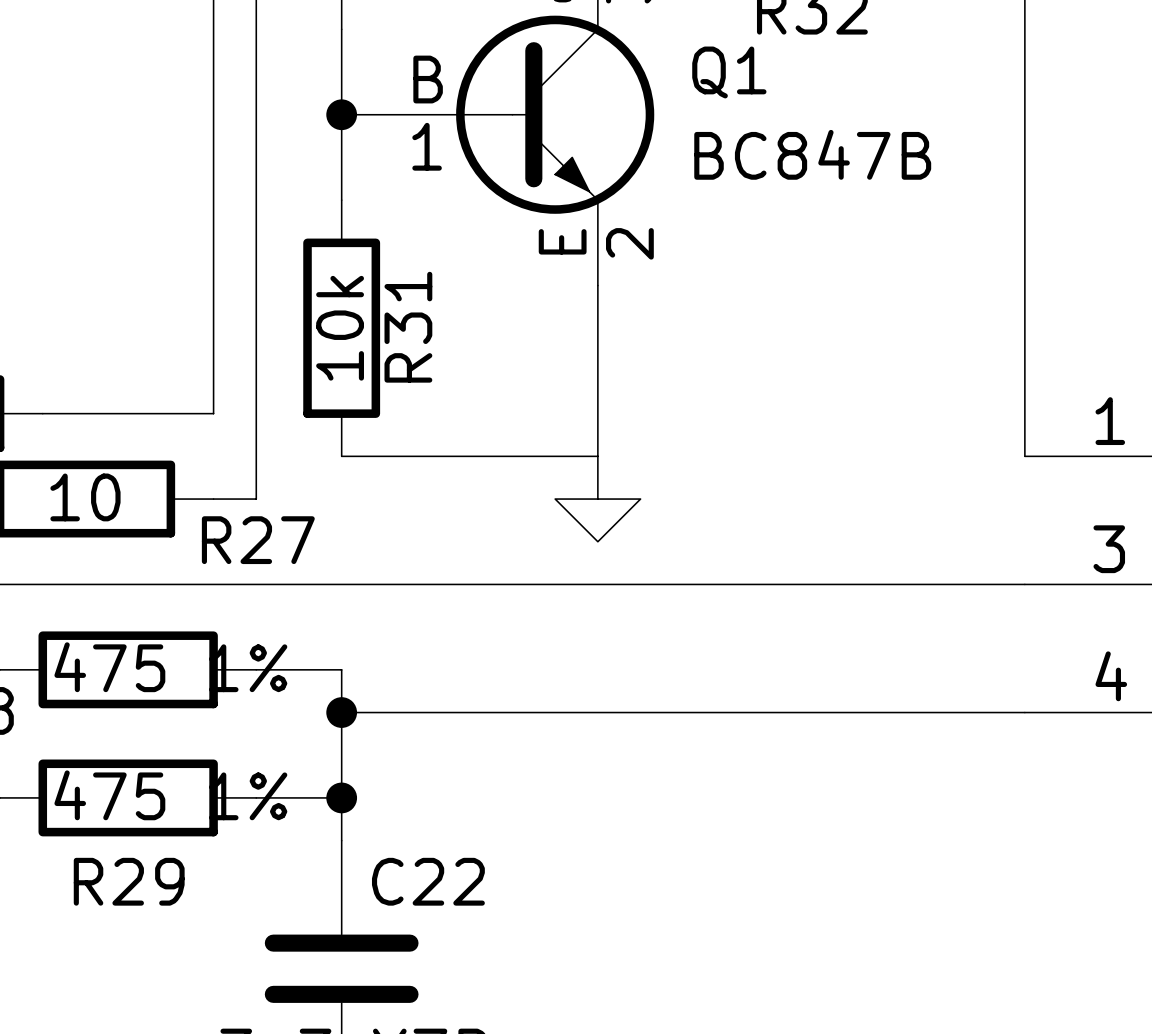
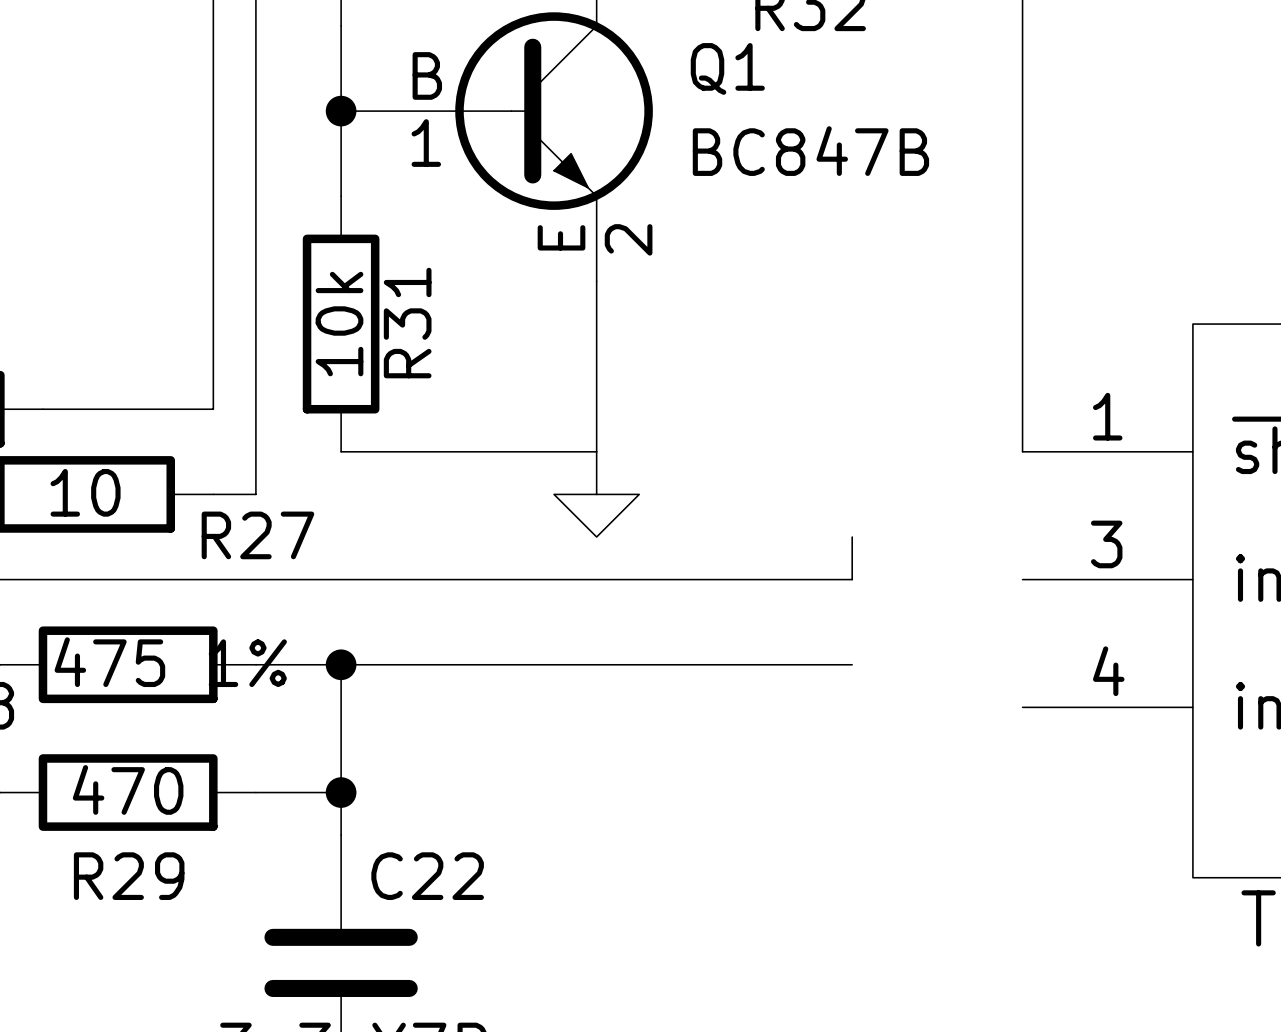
wire: (854, 584) (1024, 584) -> (852, 579) (852, 537)
wire: none -> (341, 664) (852, 664)
wire: (341, 712) (1024, 712) -> none
junction position: (341, 712) -> (341, 664)
R29 value: 475 1% (170, 795) -> 470 (128, 789)

